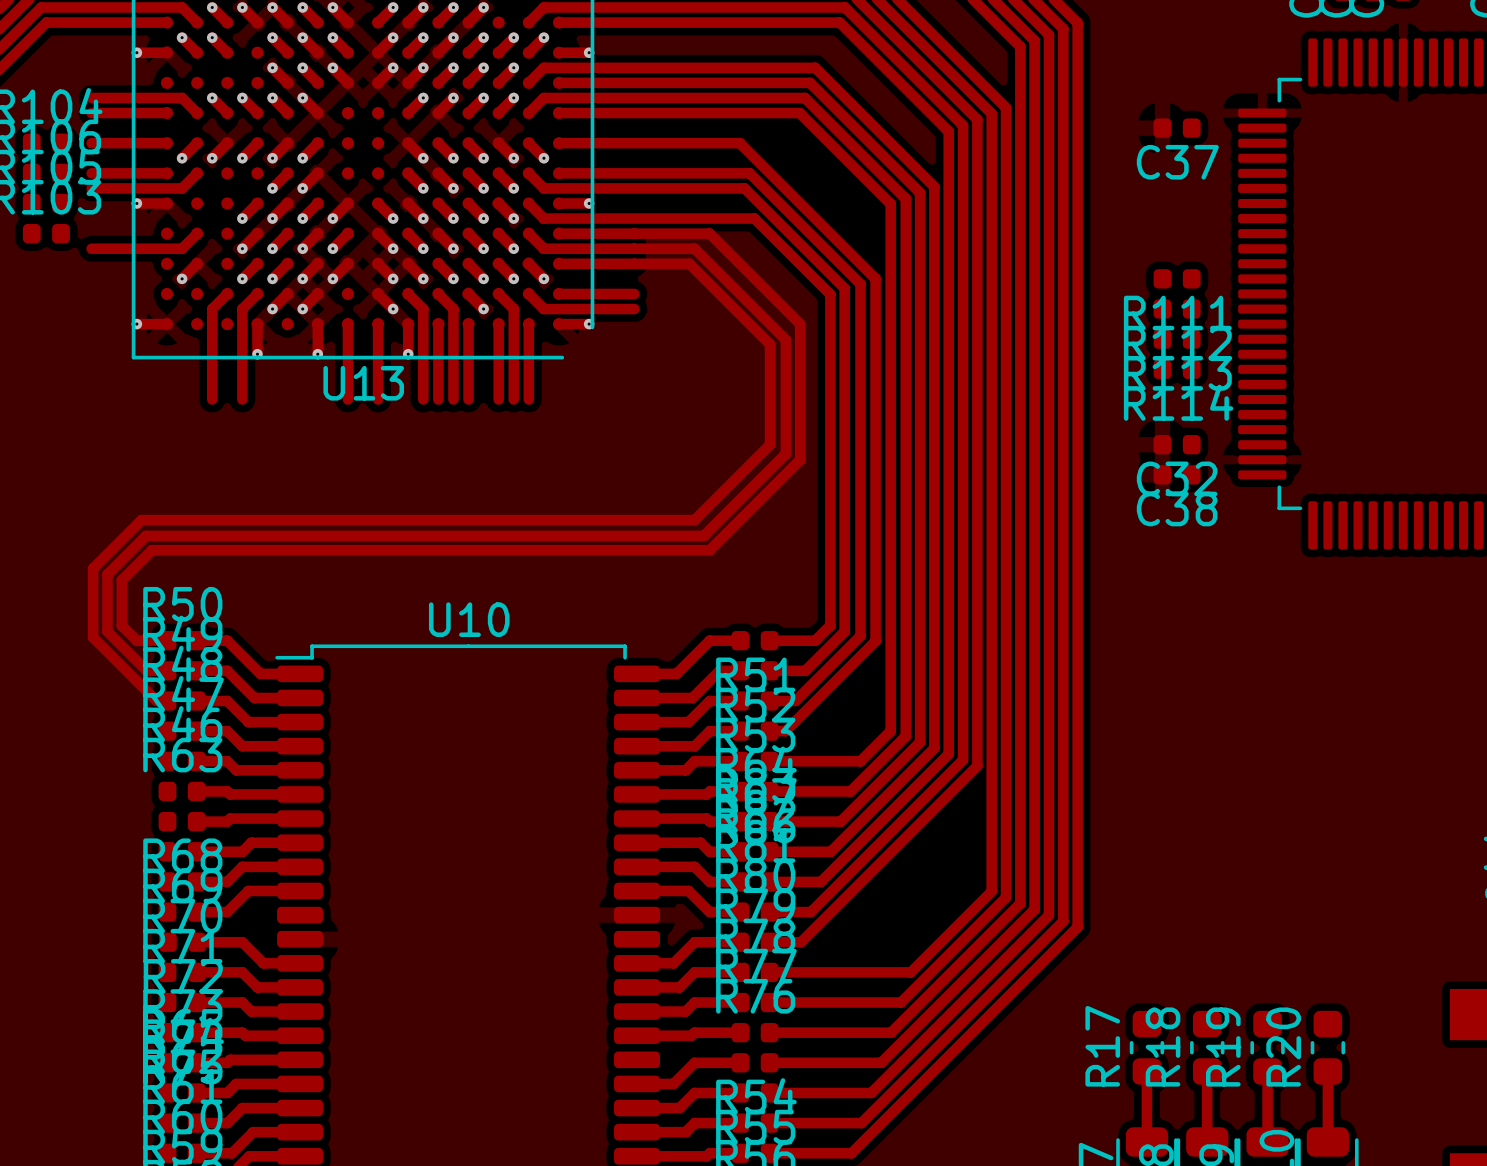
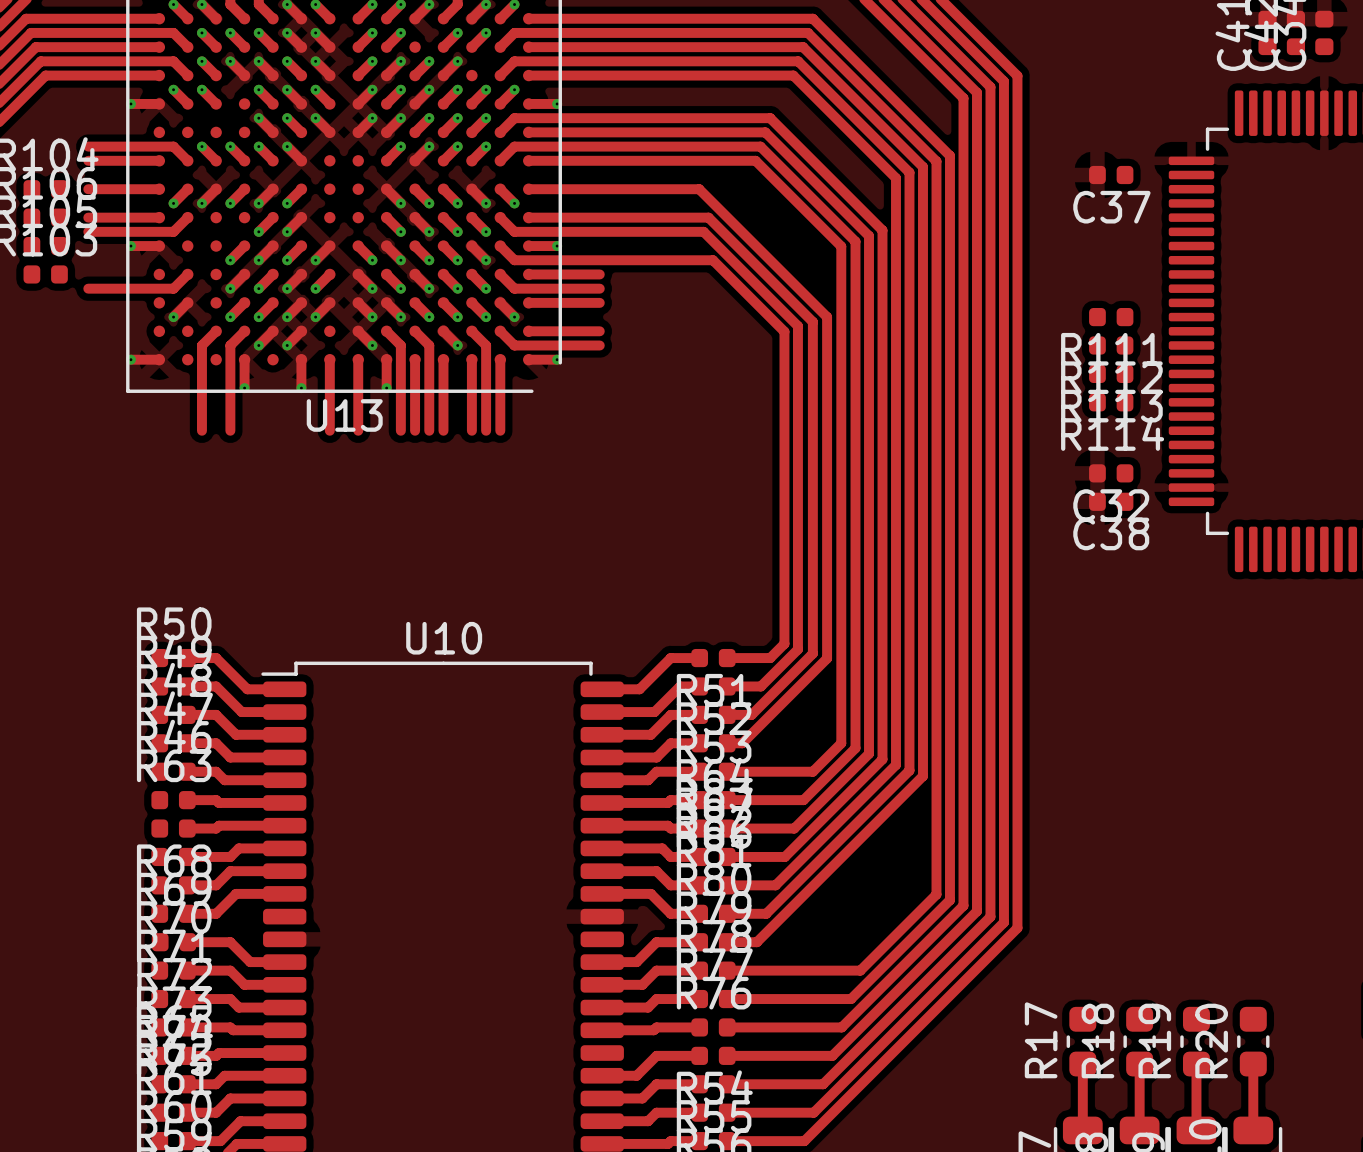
track: (634, 233) (709, 233) (800, 324) (800, 459) (709, 550) (151, 550) (121, 580) (121, 625) (136, 640) (167, 640) -> none
track: (634, 248) (694, 248) (785, 339) (785, 453) (703, 535) (146, 535) (107, 574) (107, 631) (146, 670) (167, 670) -> none
track: (634, 263) (689, 263) (770, 344) (770, 444) (694, 520) (141, 520) (93, 568) (93, 637) (156, 700) (167, 700) -> none

